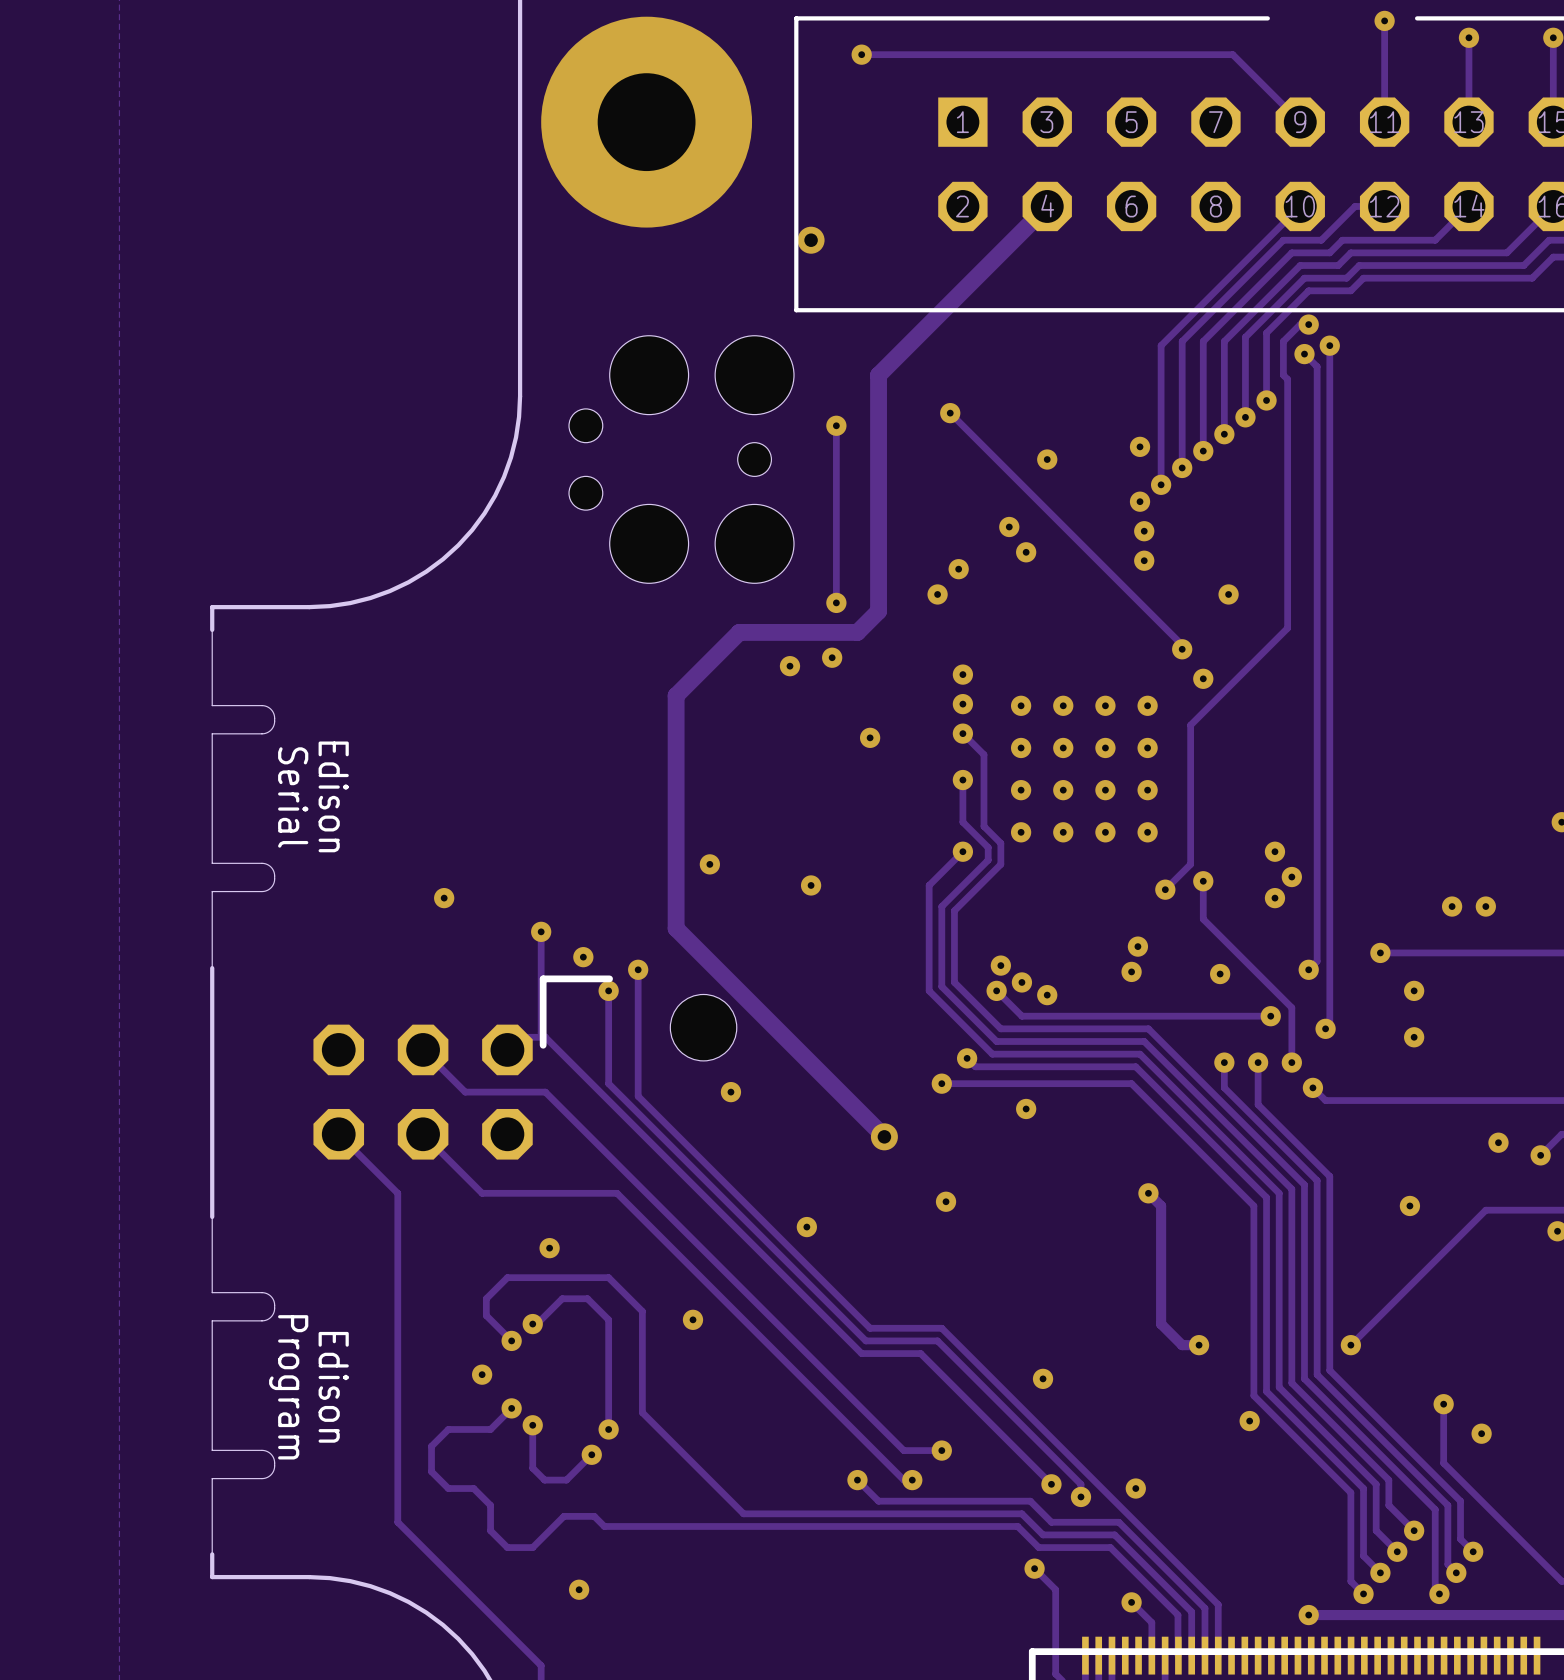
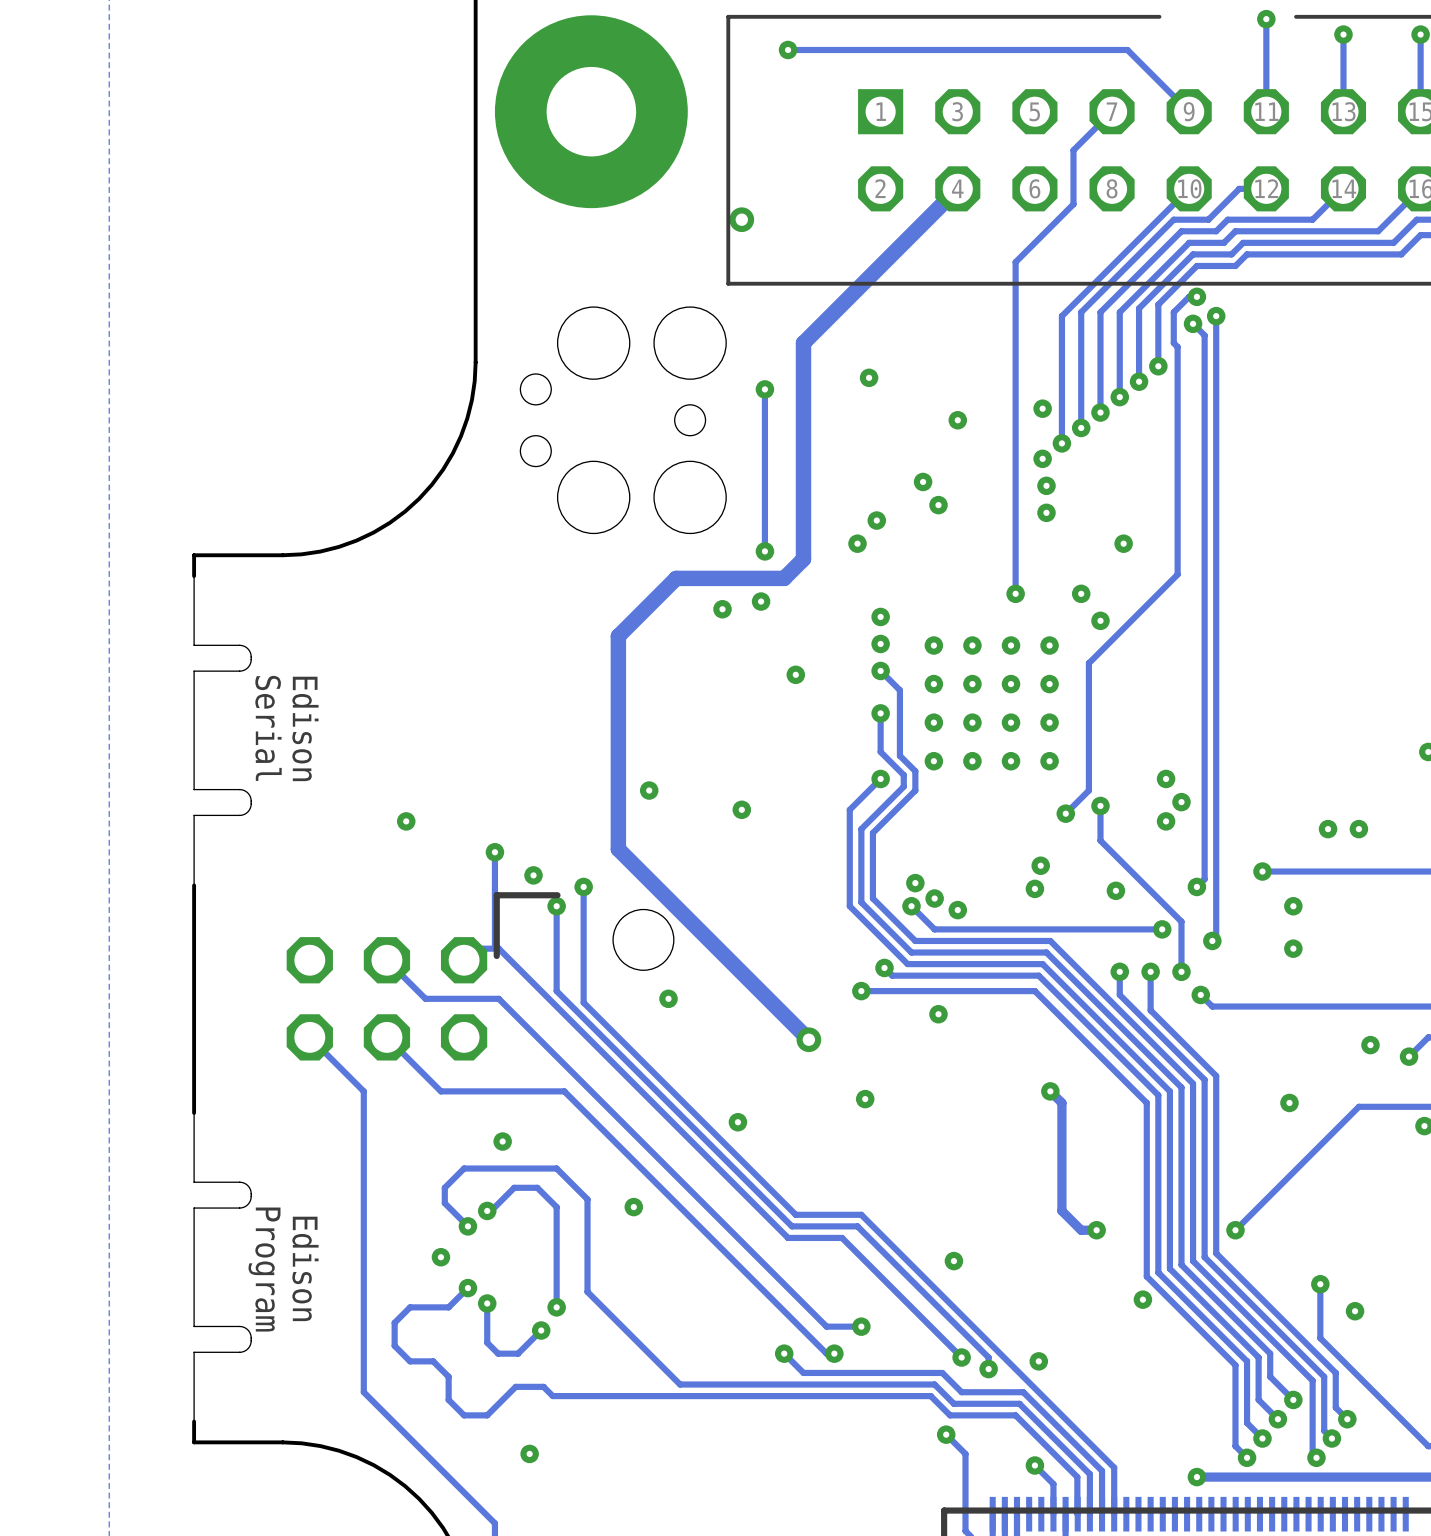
track: none -> (1112, 111) (1073, 150) (1073, 204) (1015, 262) (1015, 593)
track: (950, 413) (1182, 645) (1182, 649) -> none
via: none -> (1015, 593)

